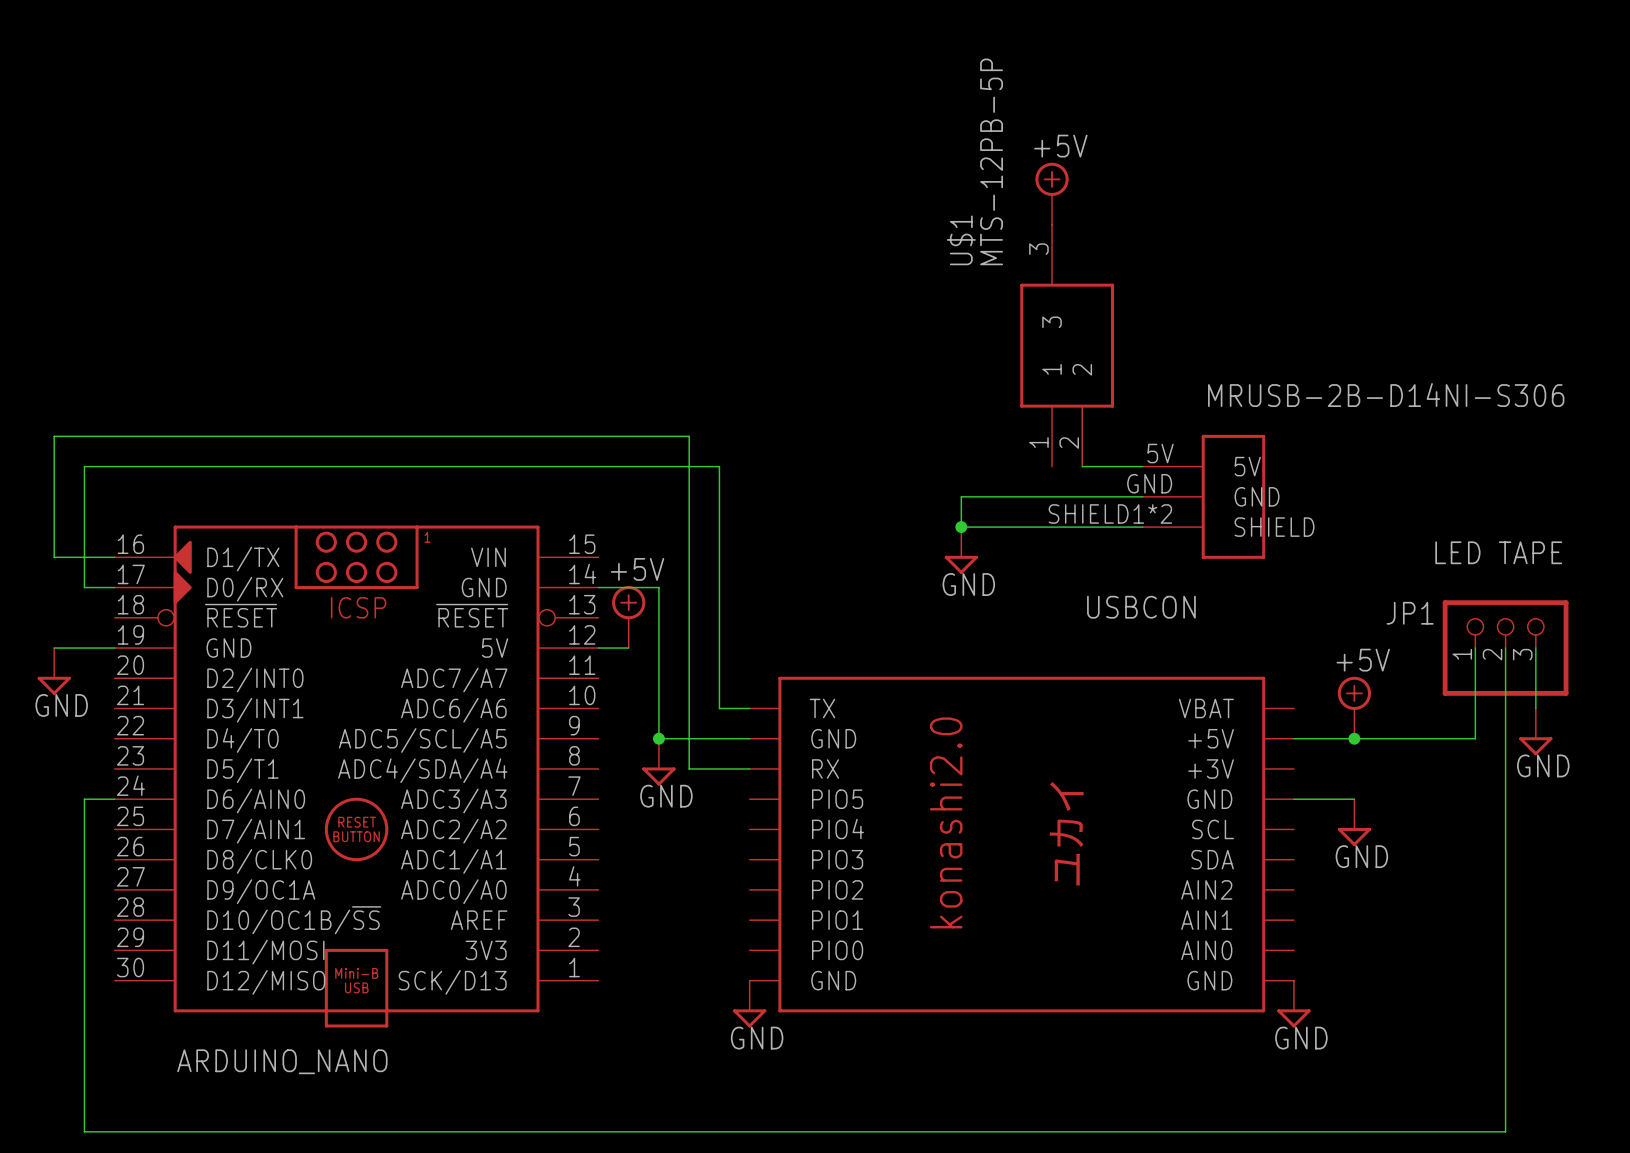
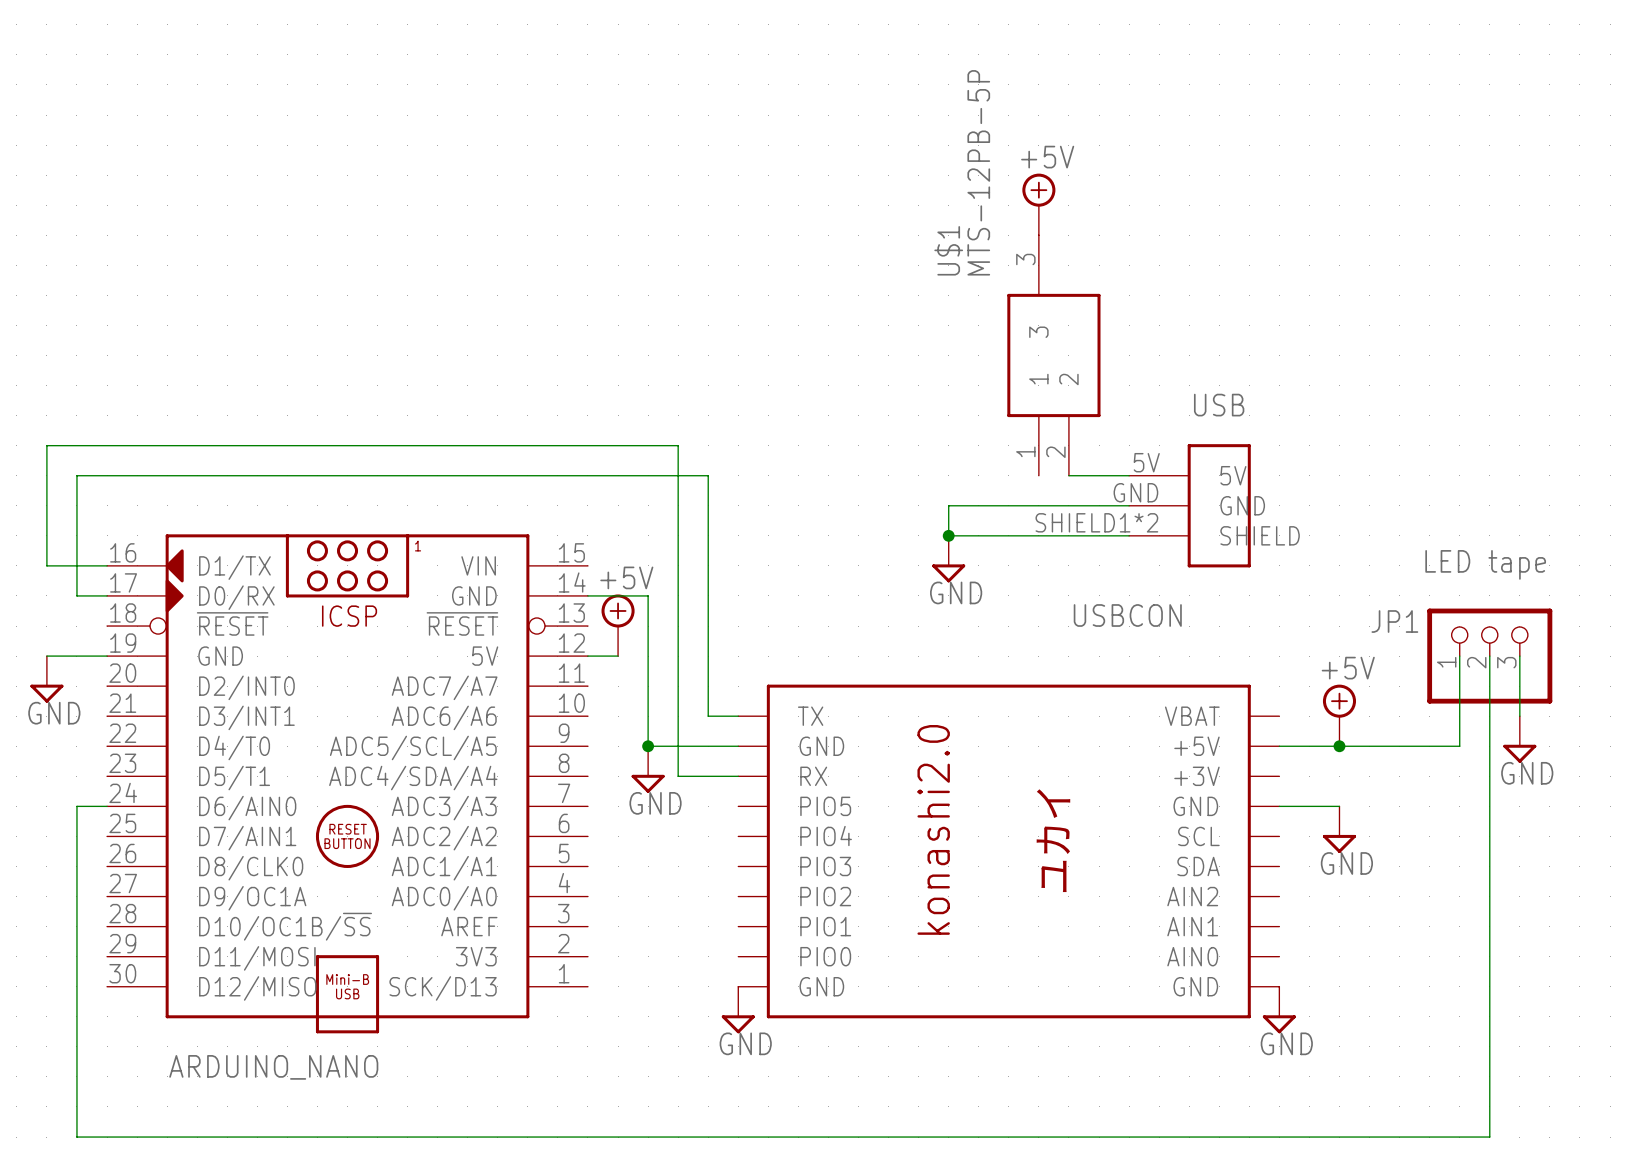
MRUSB-2B-D14NI-S306 name: MRUSB-2B-D14NI-S306 (1386, 395) -> USB (1219, 405)
JP1 value: LED TAPE (1498, 552) -> LED tape (1485, 564)

